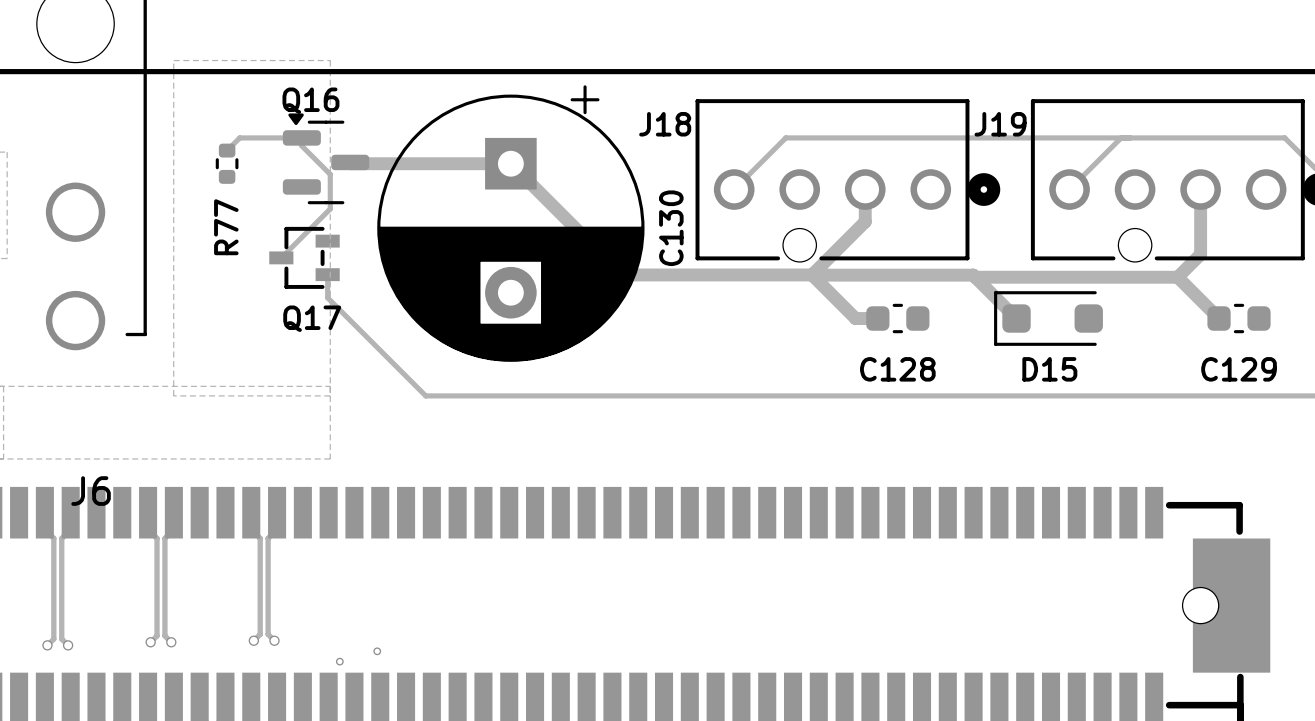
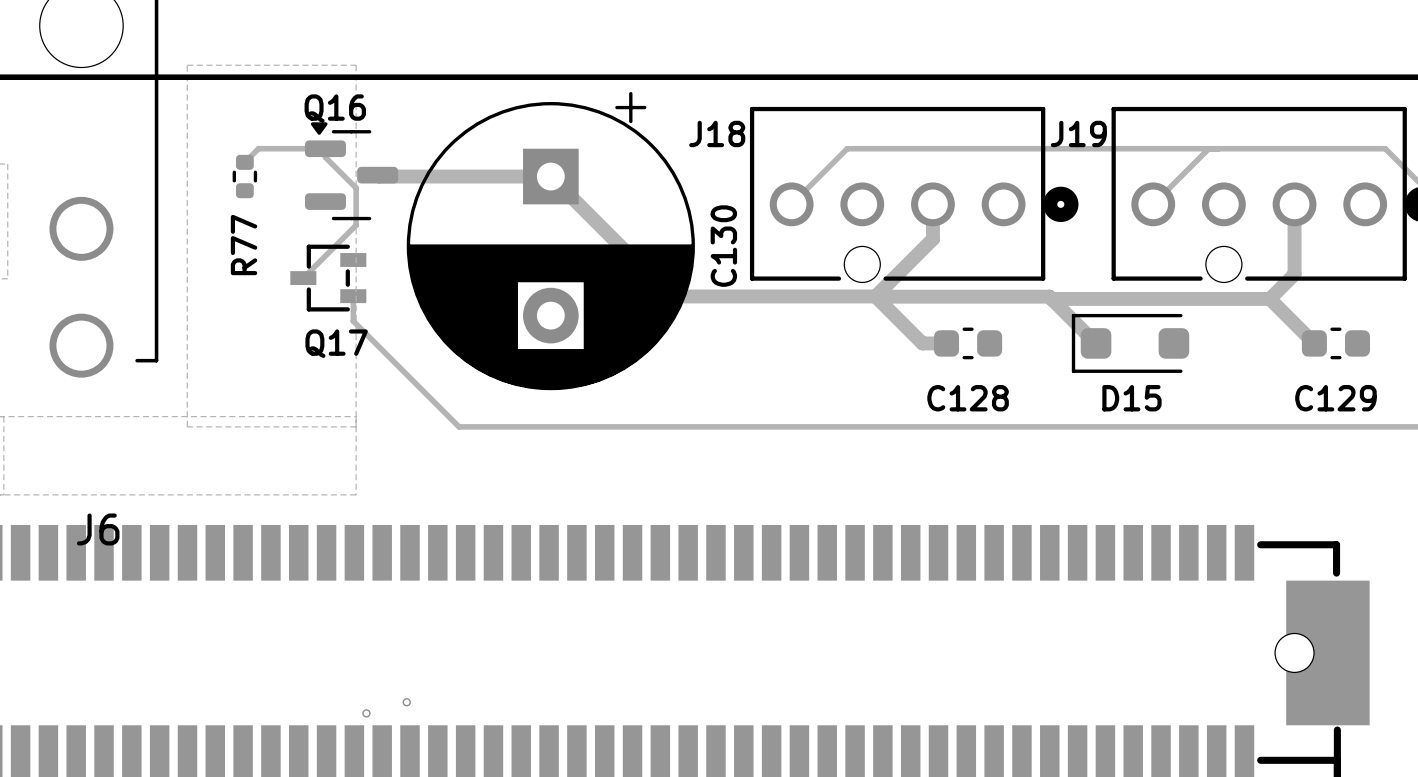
track: (251, 512) (251, 529) (260, 538) (260, 634) (253, 640) -> none
track: (277, 512) (277, 529) (268, 538) (268, 634) (274, 640) -> none
track: (44, 524) (44, 529) (53, 538) (53, 639) (47, 645) -> none
track: (70, 524) (70, 529) (61, 538) (61, 639) (68, 645) -> none
track: (148, 524) (148, 529) (157, 538) (157, 635) (150, 642) -> none
track: (173, 524) (173, 529) (164, 538) (164, 635) (171, 642) -> none
via: (253, 640) -> none
via: (274, 640) -> none
via: (150, 642) -> none
via: (171, 642) -> none
via: (47, 645) -> none
via: (68, 645) -> none

